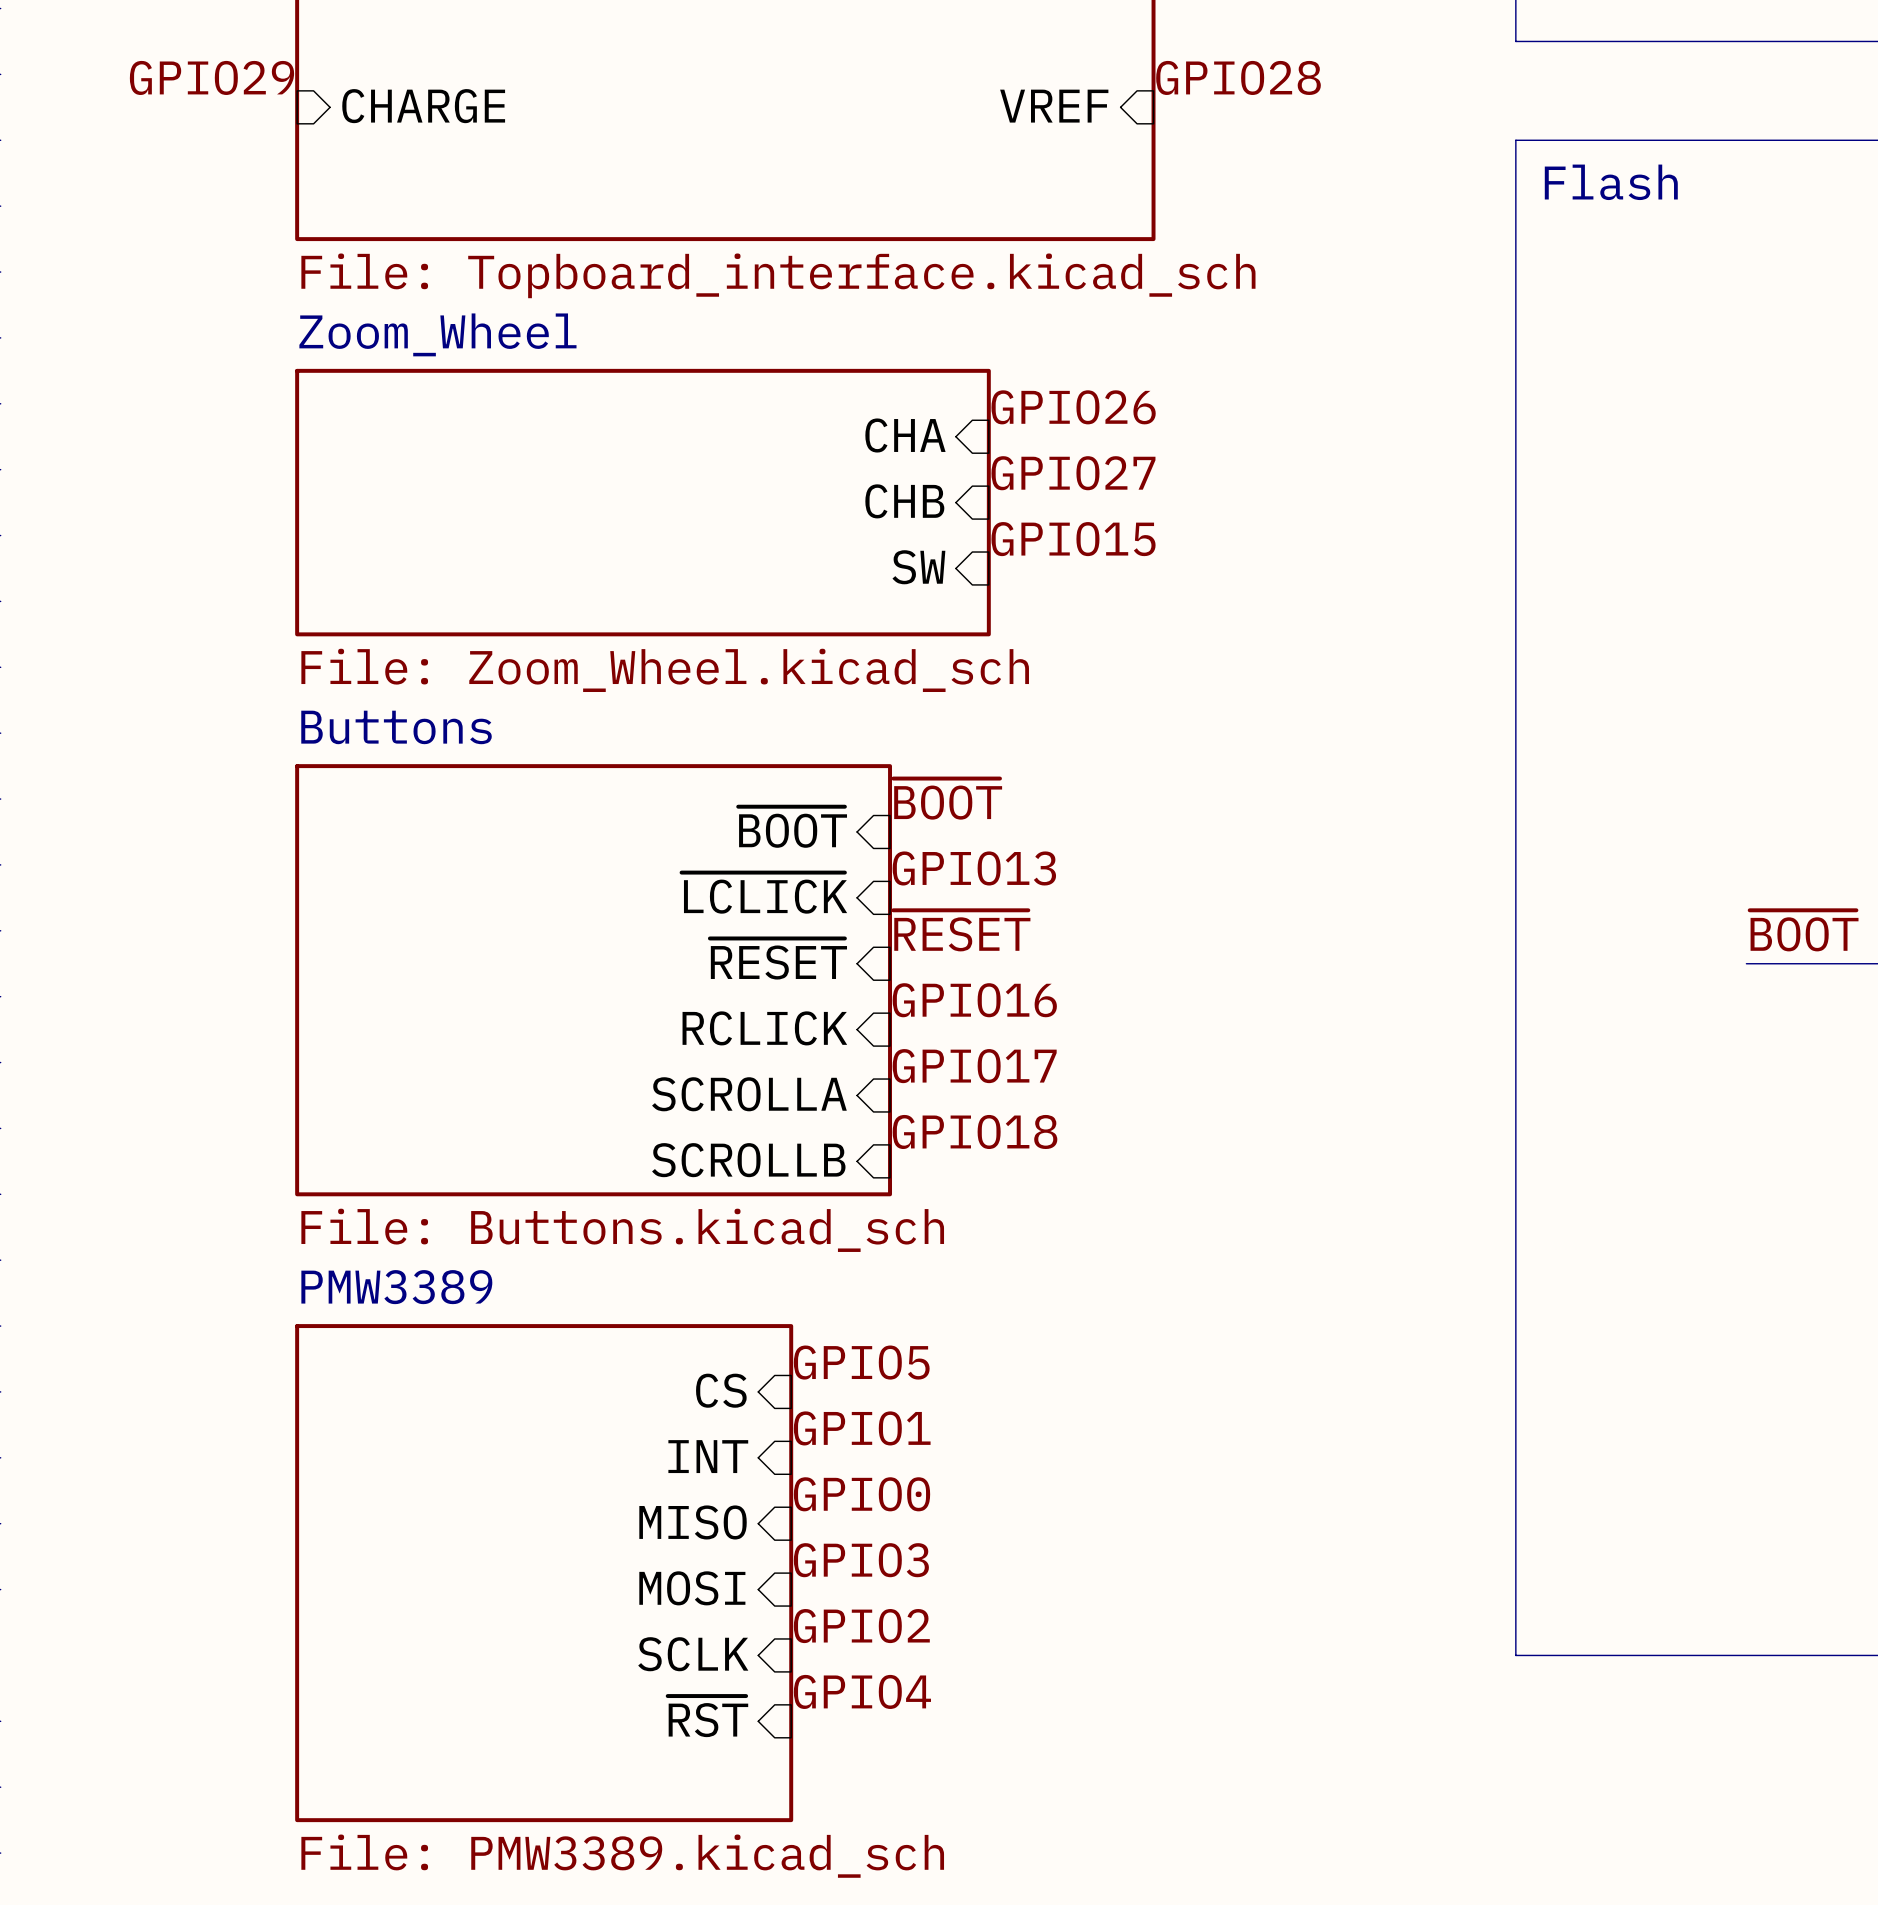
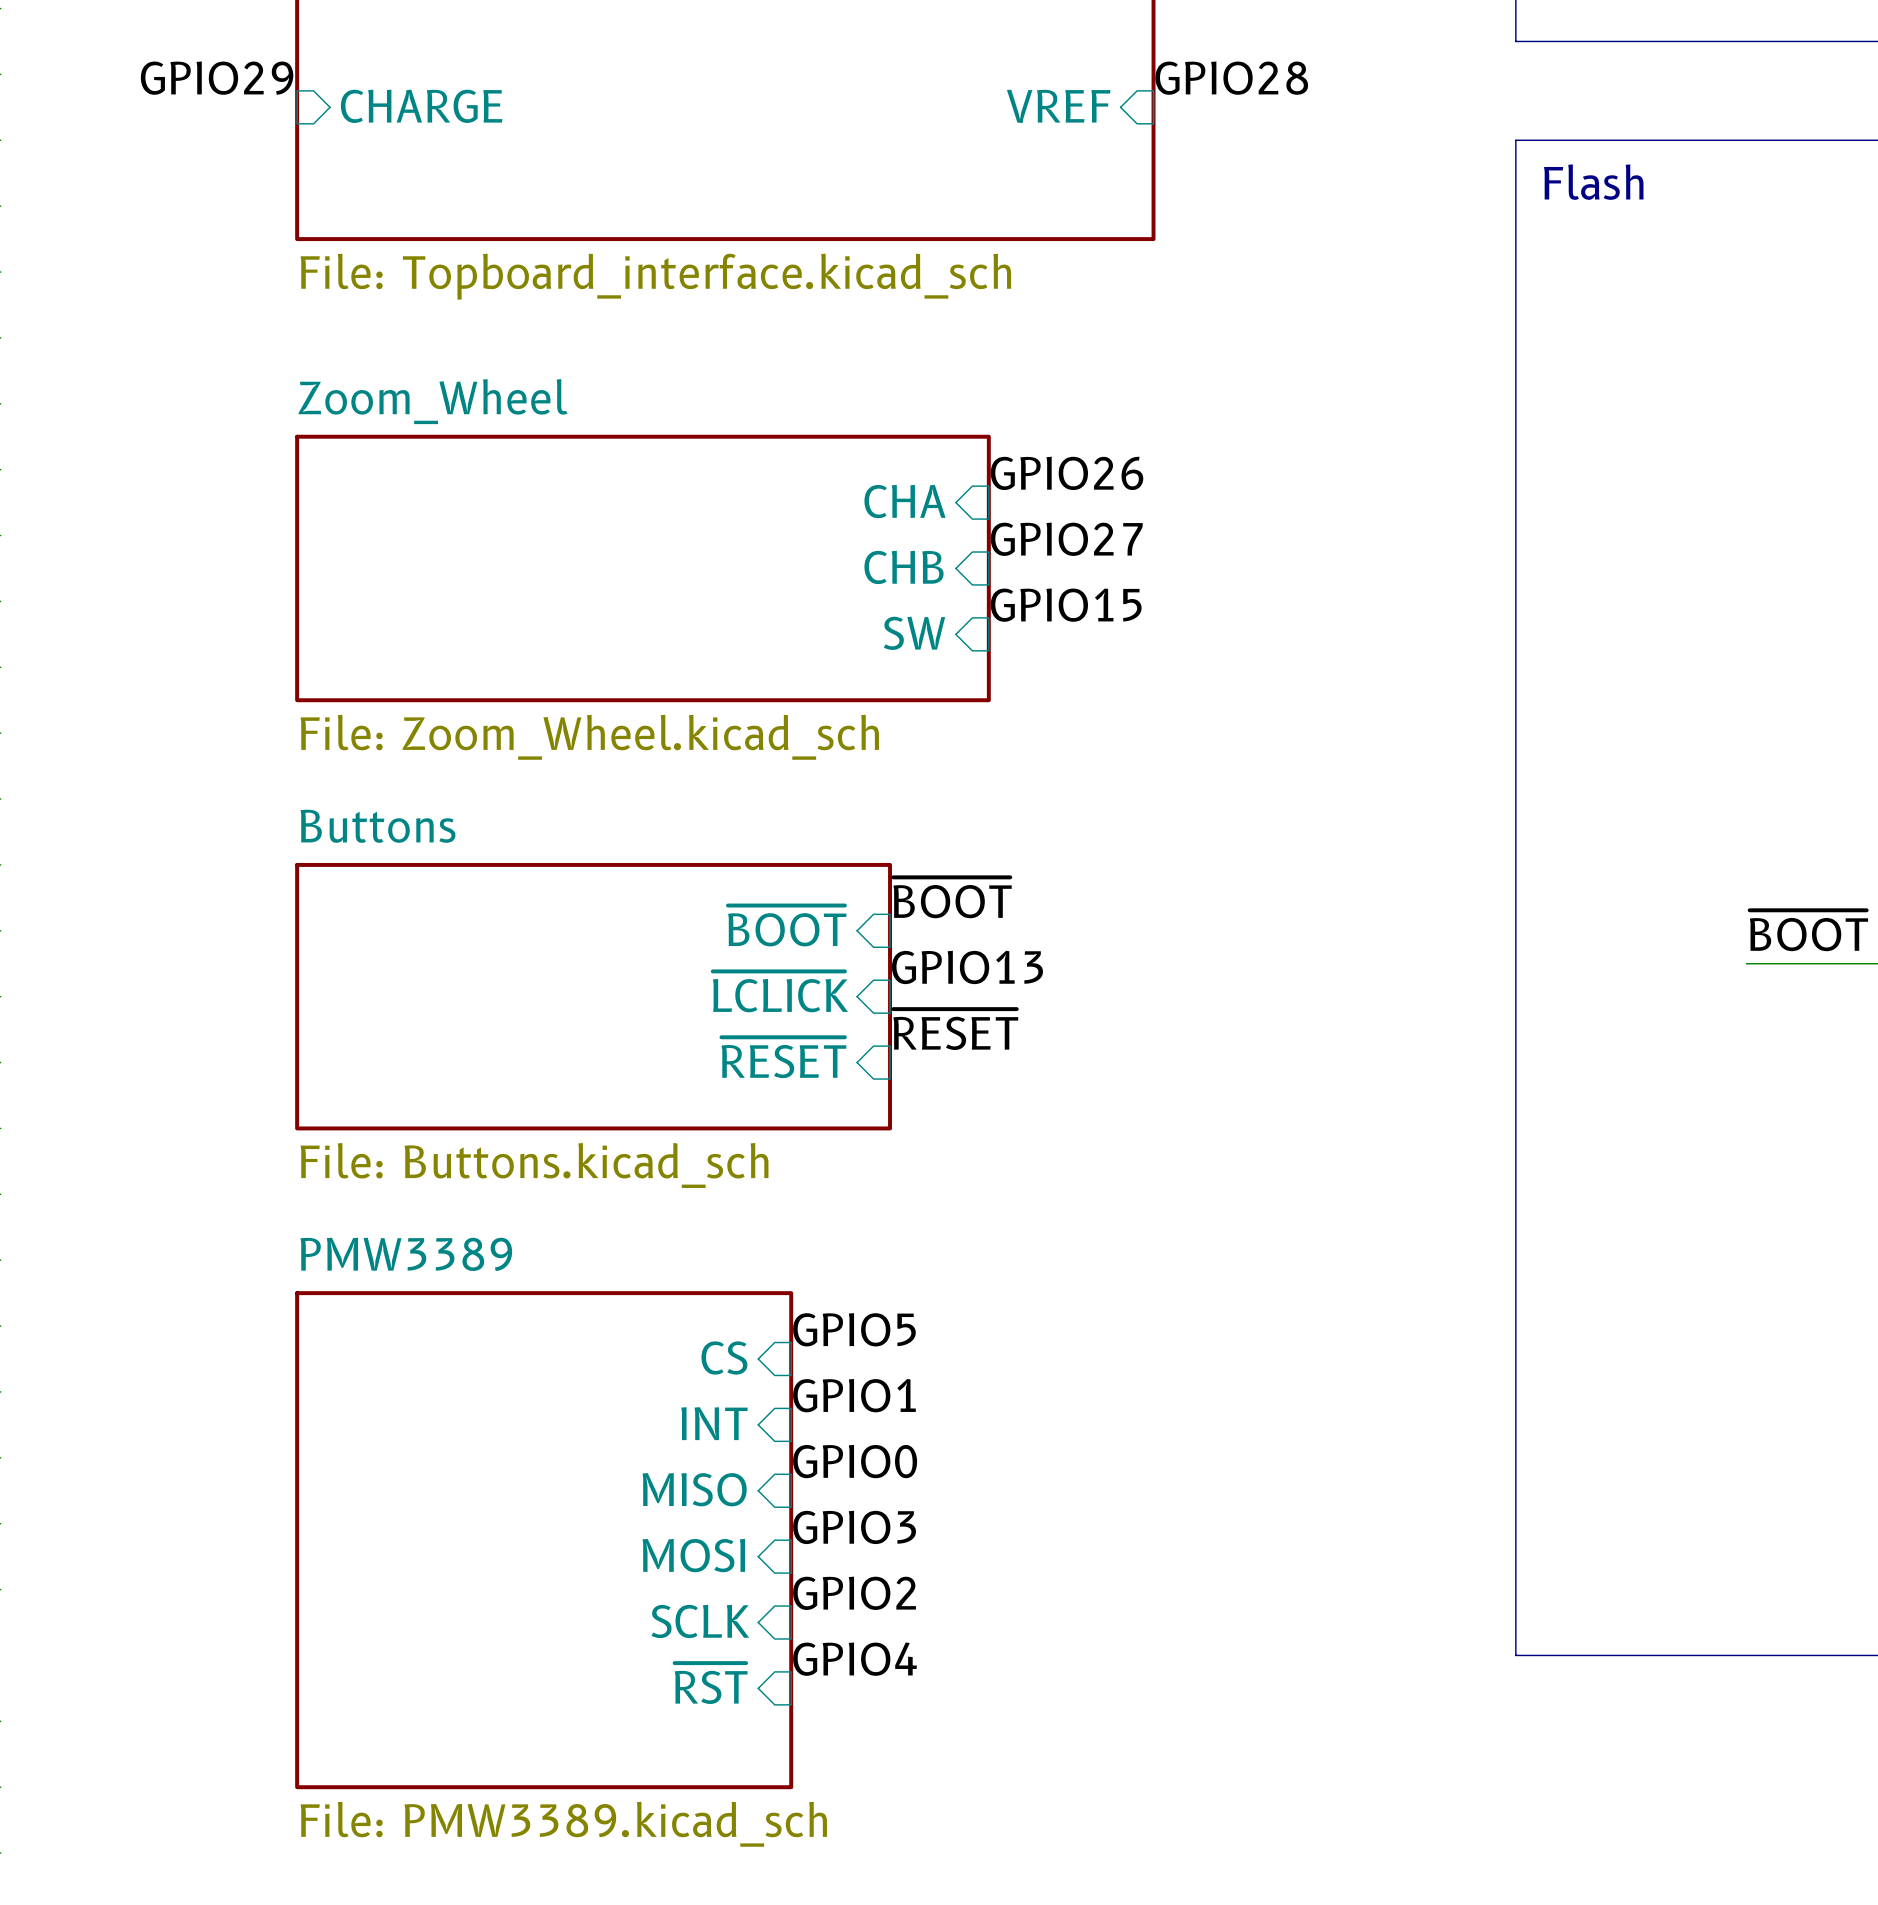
label: GPIO26 (1073, 407) -> none
sheet pin: CHA (905, 435) -> none
label: GPIO27 (1073, 473) -> GPIO26 (1067, 473)
sheet pin: CHB (904, 501) -> CHA (905, 501)
sheet Zoom_Wheel position: (642, 502) -> (642, 568)
label: GPIO15 (1073, 539) -> GPIO27 (1066, 539)
sheet pin: SW (918, 567) -> CHB (904, 567)
label: none -> GPIO15 (1066, 605)
sheet pin: none -> SW (914, 633)
sheet Buttons name position: Buttons (396, 727) -> Buttons (378, 826)
sheet Buttons shape: [295, 764, 892, 1197] -> [295, 862, 892, 1131]
label position: ~{BOOT} (947, 799) -> ~{BOOT} (952, 897)
sheet pin position: ~{BOOT} (792, 827) -> ~{BOOT} (787, 925)
label position: GPIO13 (974, 868) -> GPIO13 (967, 967)
sheet pin position: ~{LCLICK} (764, 893) -> ~{LCLICK} (780, 991)
label position: ~{RESET} (961, 930) -> ~{RESET} (955, 1029)
sheet pin position: ~{RESET} (778, 959) -> ~{RESET} (783, 1057)
label: GPIO16 (974, 1000) -> none
sheet pin: RCLICK (764, 1028) -> none
label: GPIO17 (974, 1066) -> none
sheet pin: SCROLLA (749, 1094) -> none
label: GPIO18 (974, 1131) -> none
sheet pin: SCROLLB (748, 1160) -> none
sheet Buttons value position: File: Buttons.kicad_sch (622, 1230) -> File: Buttons.kicad_sch (534, 1165)
label position: GPIO5 (861, 1362) -> GPIO5 (854, 1329)
sheet pin position: CS (721, 1390) -> CS (724, 1357)
label position: GPIO1 (862, 1428) -> GPIO1 (854, 1395)
sheet pin position: INT (708, 1456) -> INT (714, 1423)
label position: GPIO0 (861, 1494) -> GPIO0 (855, 1461)
sheet pin position: MISO (693, 1522) -> MISO (694, 1489)
label position: GPIO3 (861, 1560) -> GPIO3 (854, 1527)
sheet PMW3389 position: (544, 1573) -> (544, 1540)
sheet pin position: MOSI (692, 1588) -> MOSI (693, 1555)
label position: GPIO2 (861, 1626) -> GPIO2 (854, 1593)
sheet pin position: SCLK (693, 1654) -> SCLK (700, 1621)
label position: GPIO4 (862, 1691) -> GPIO4 (855, 1659)
sheet pin position: ~{RST} (707, 1716) -> ~{RST} (711, 1683)

